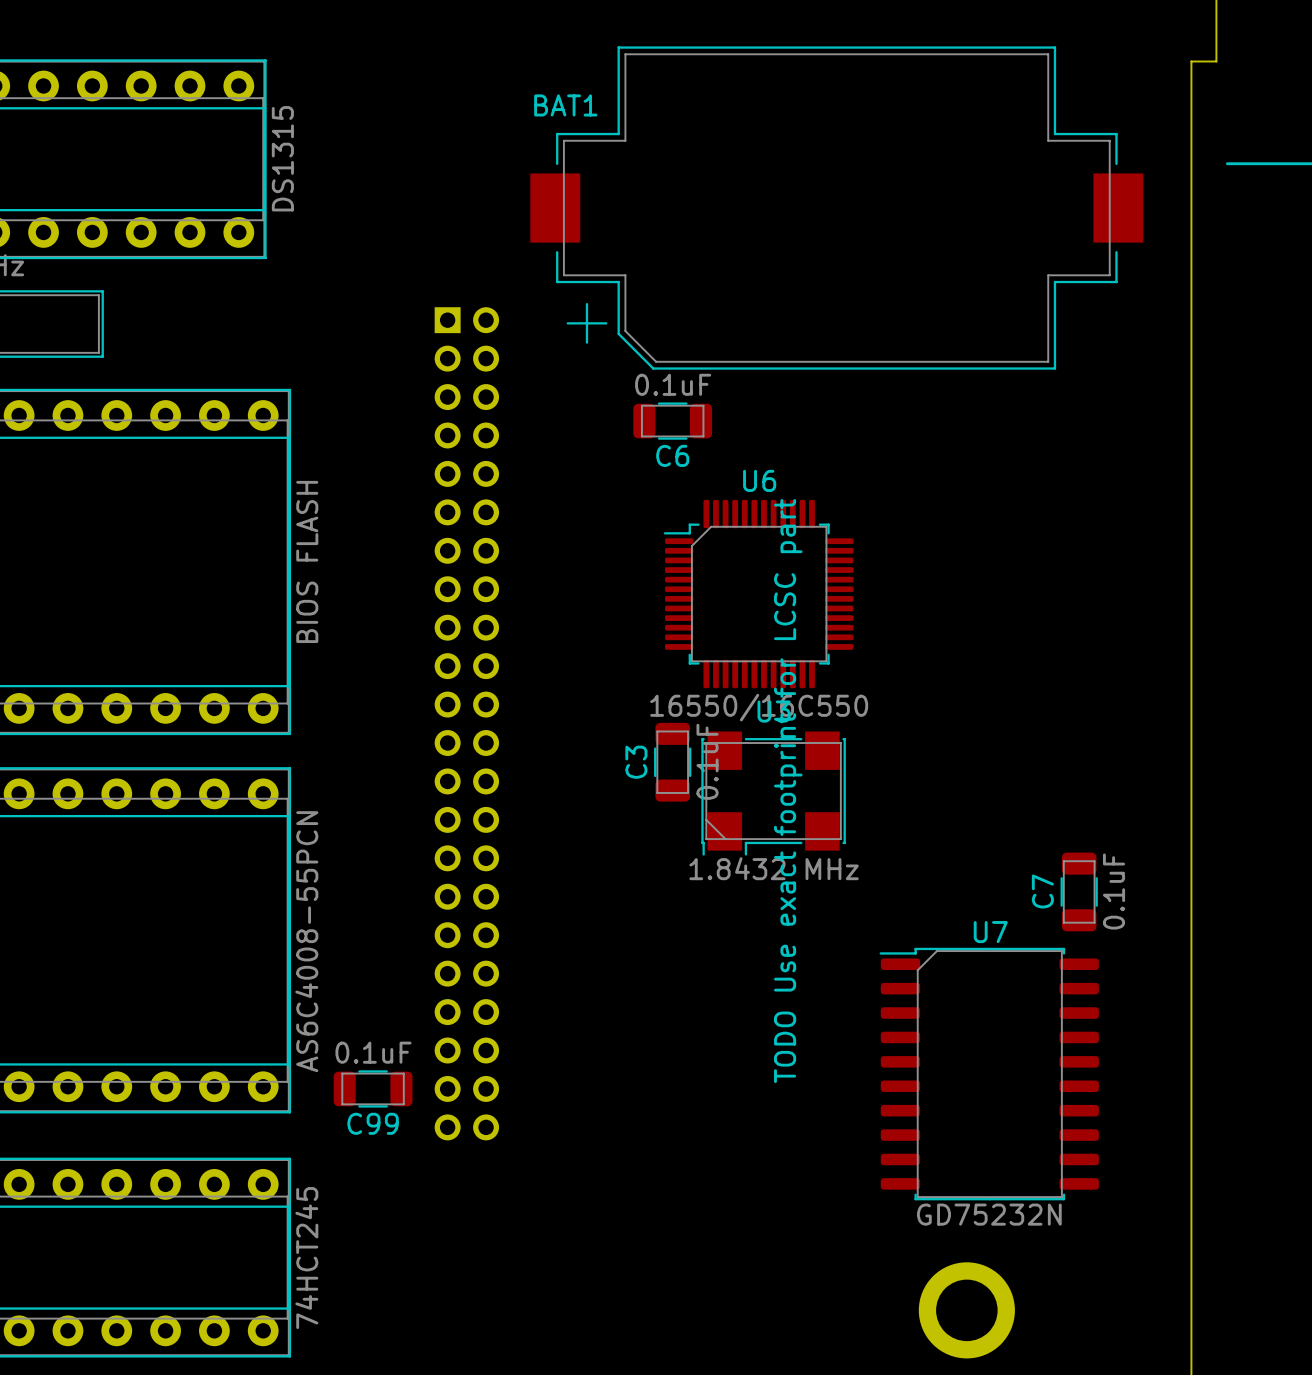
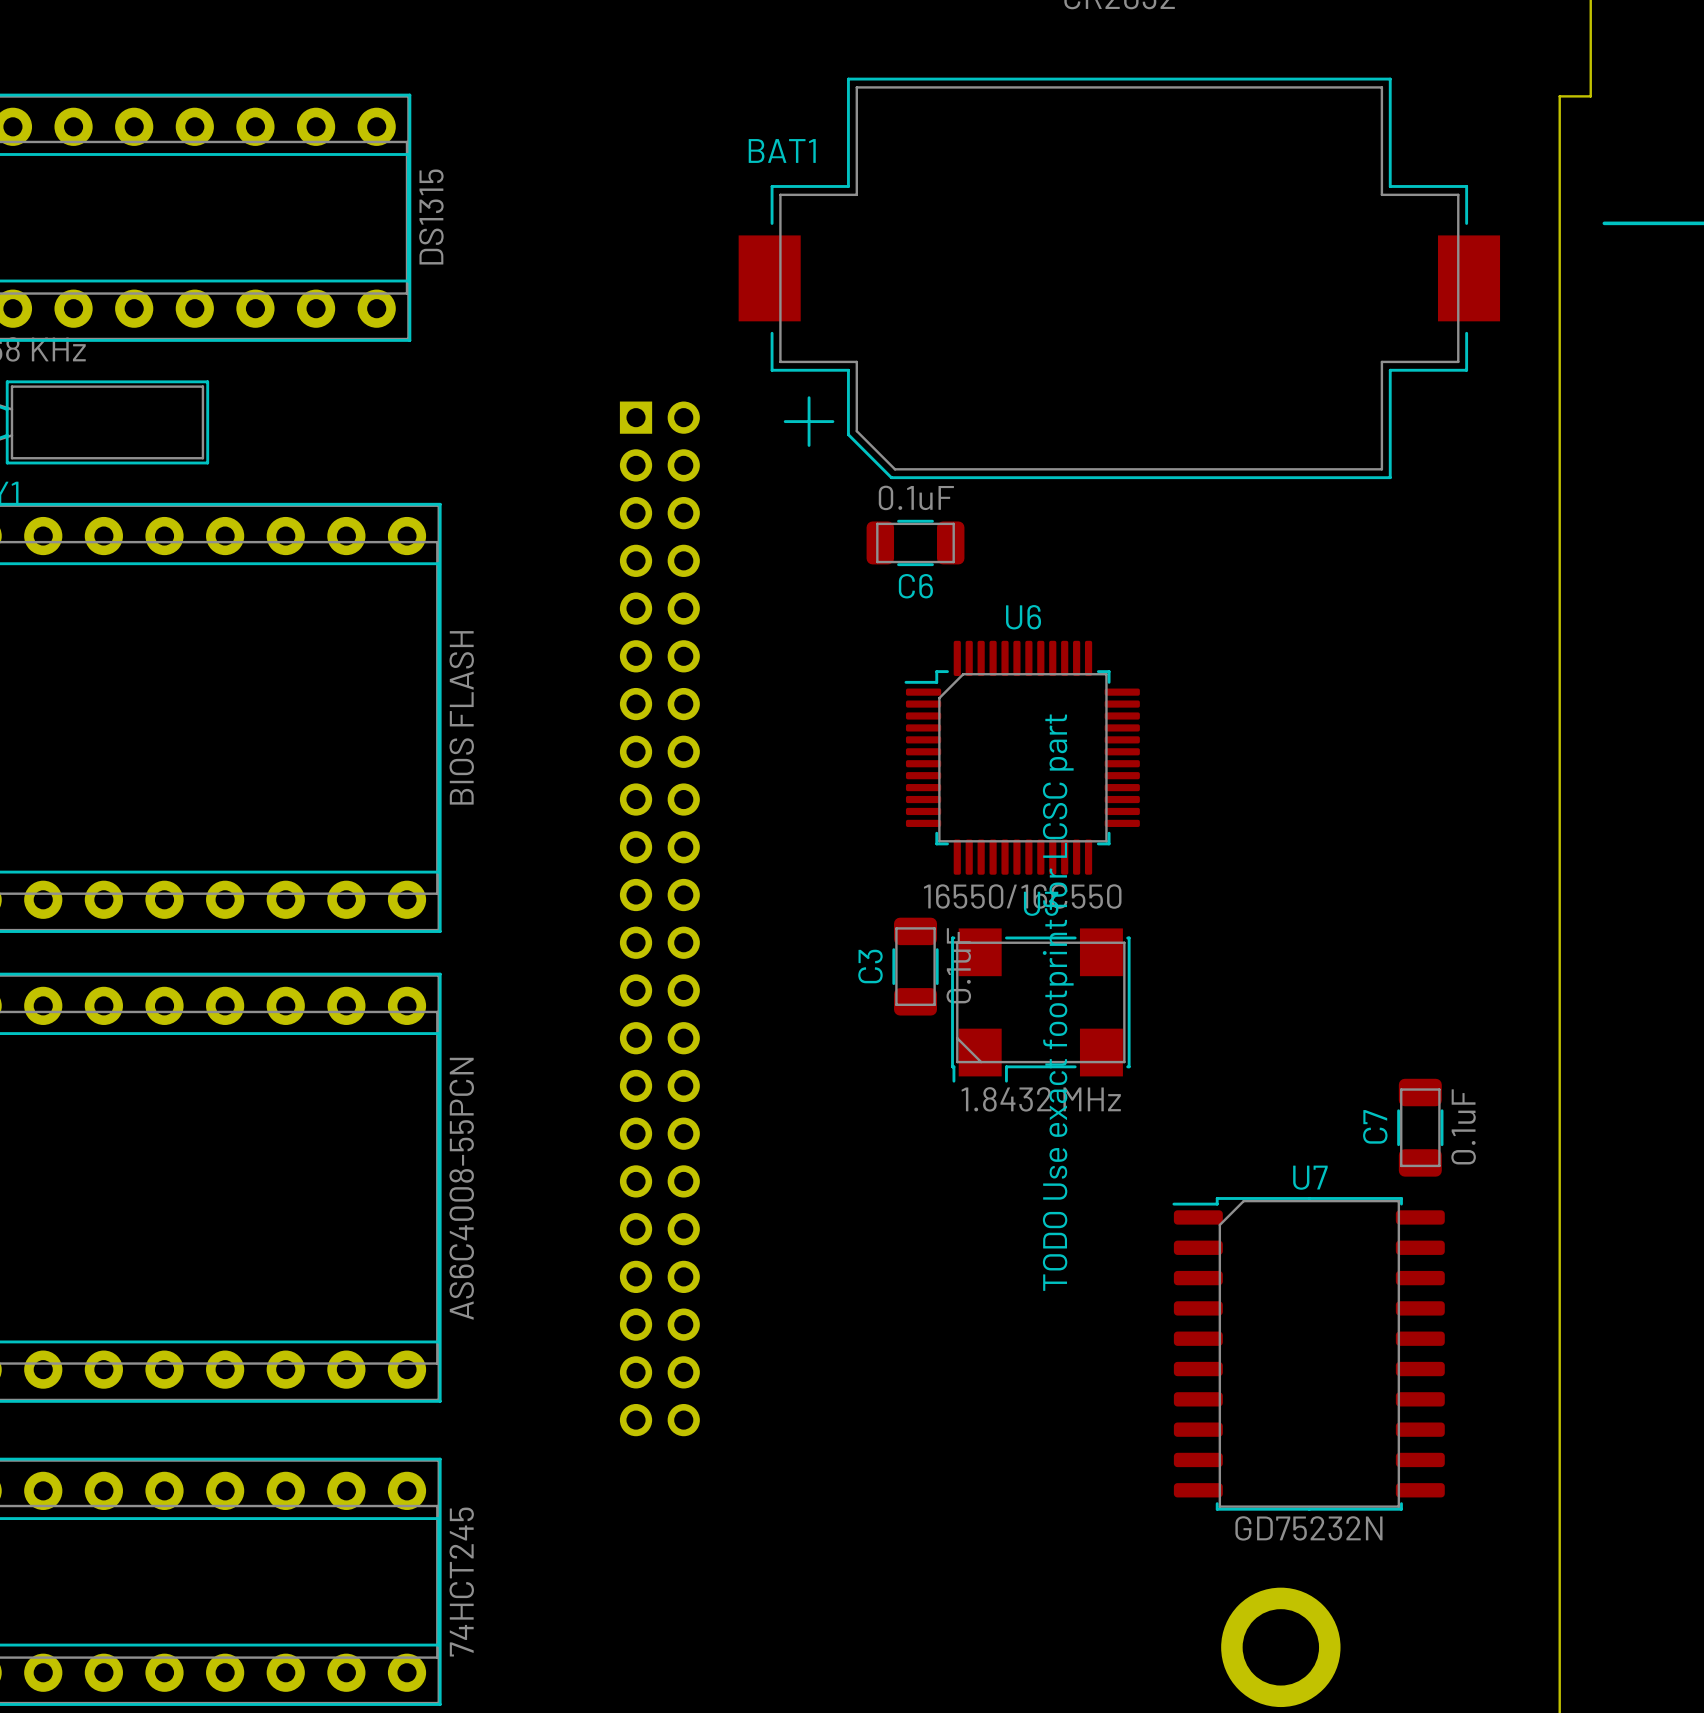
C99: 0.1uF (373, 1088) -> none

